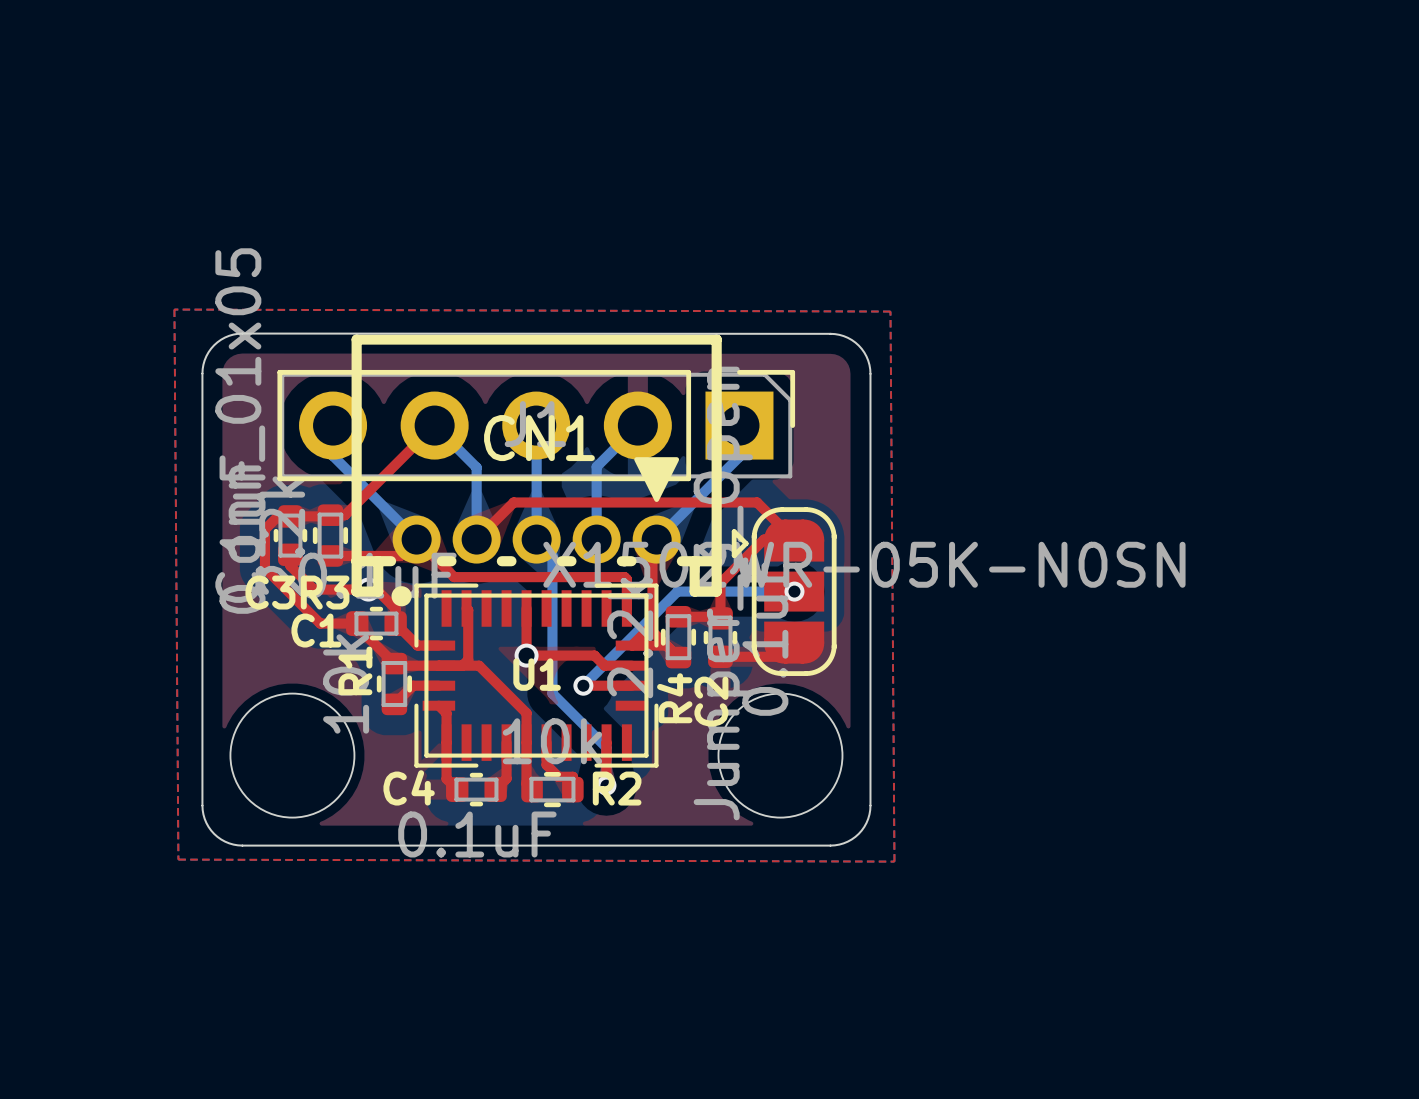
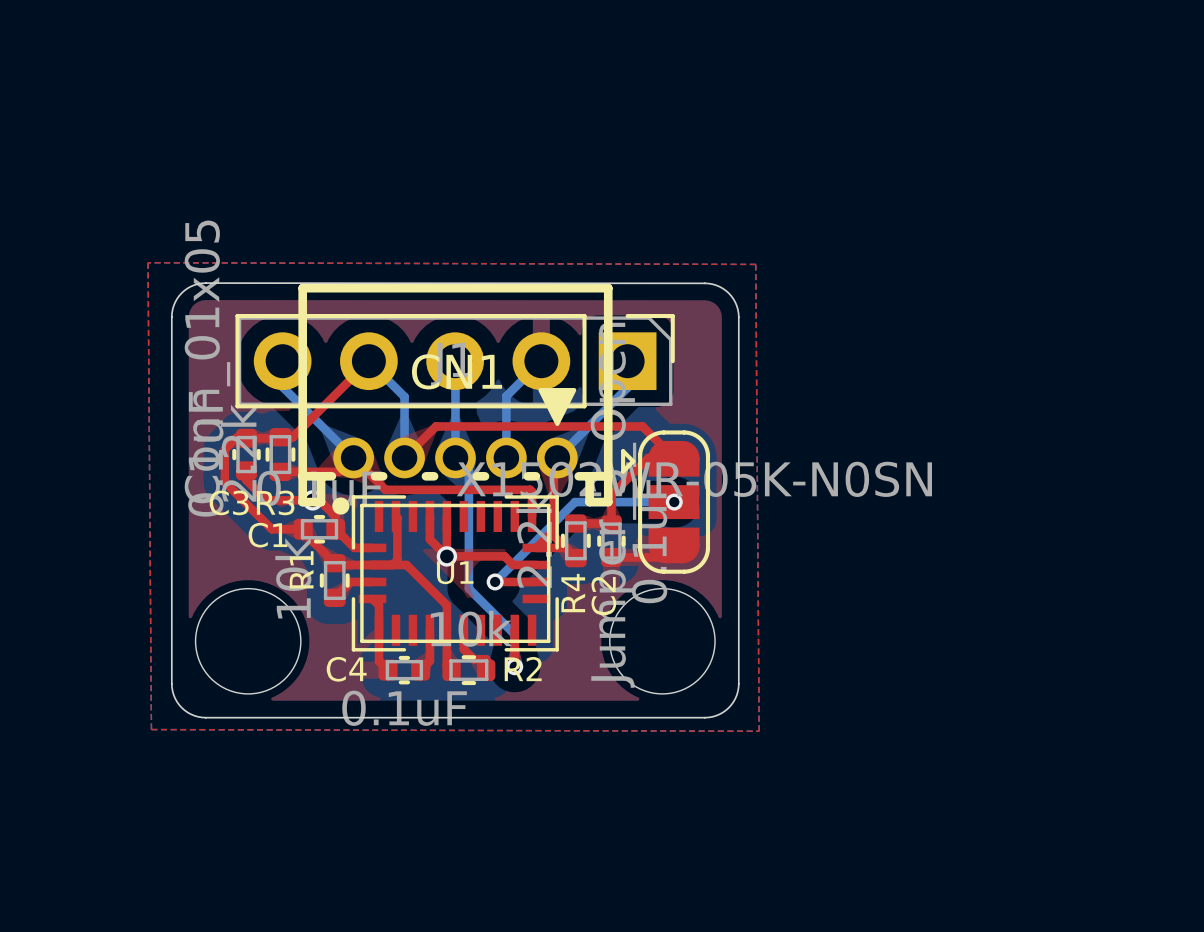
top track: none -> (429, 516) (429, 539) (446, 556)

